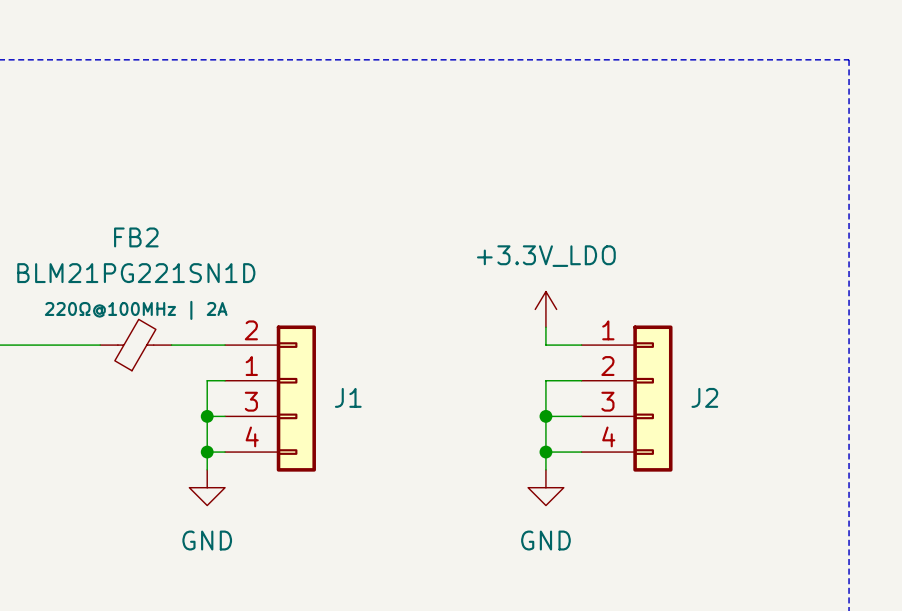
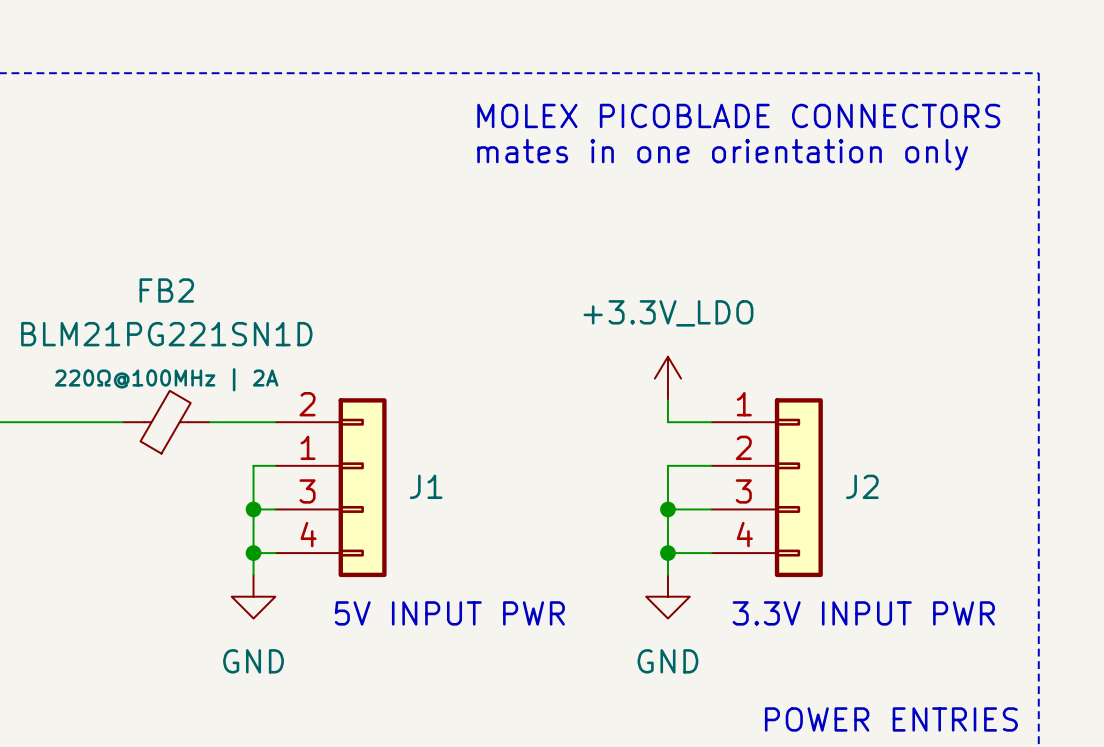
text: none -> MOLEX PICOBLADE CONNECTORS (738, 115)
text: none -> mates in one orientation only (722, 154)
text: none -> 5V INPUT PWR (449, 613)
text: none -> 3.3V INPUT PWR (863, 613)
text: none -> POWER ENTRIES (891, 719)

